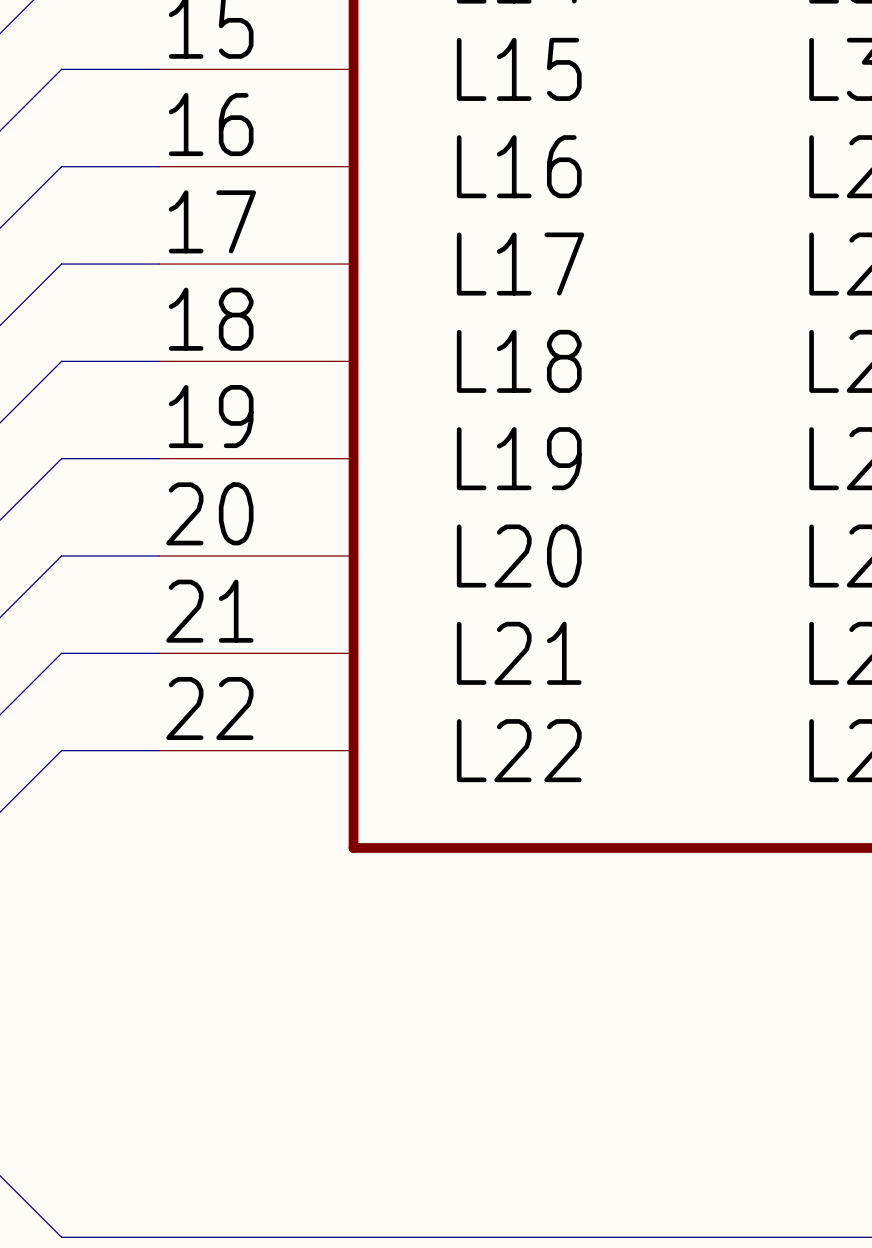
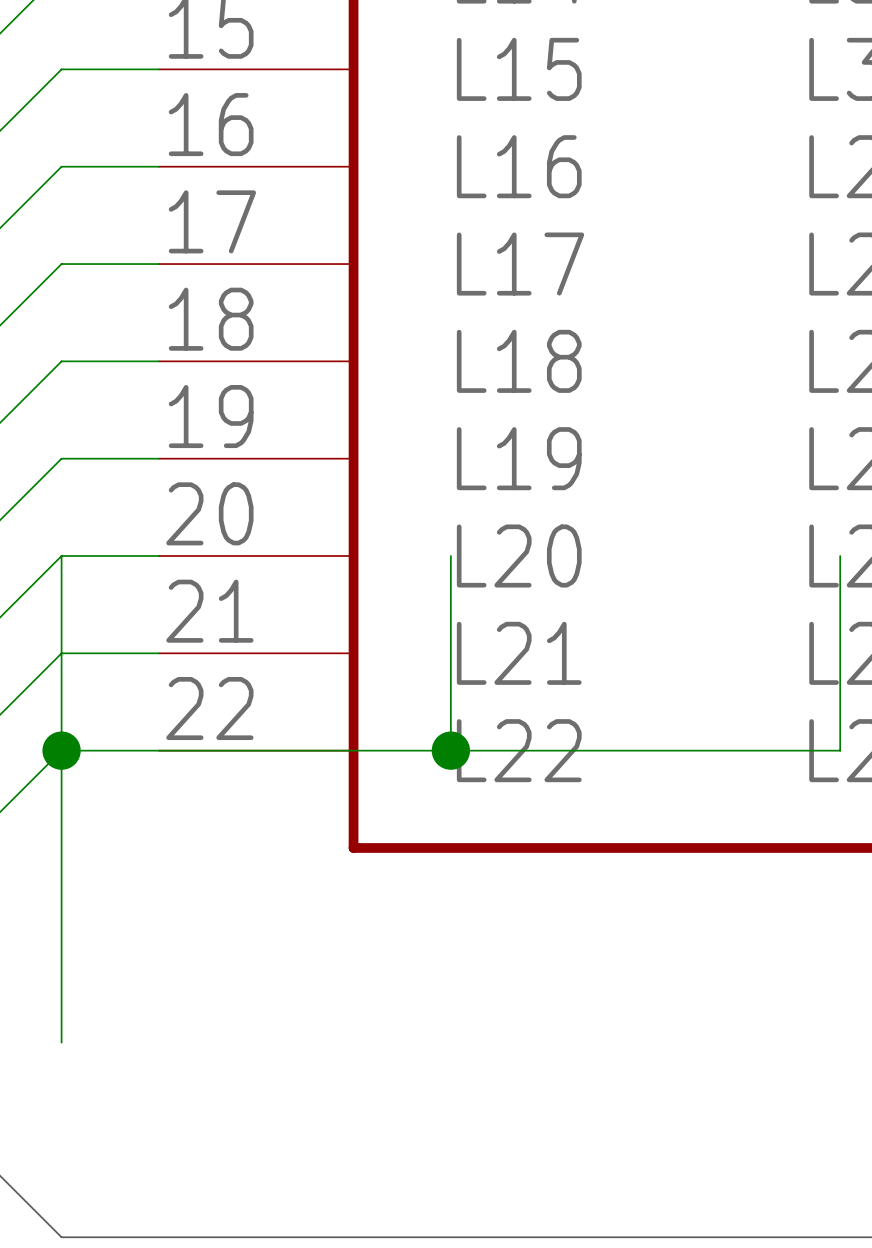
wire: none -> (61, 556) (61, 1042)
wire: none -> (450, 556) (450, 750)
wire: none -> (840, 556) (840, 750) (158, 750)
junction: none -> (61, 750)
junction: none -> (450, 750)

